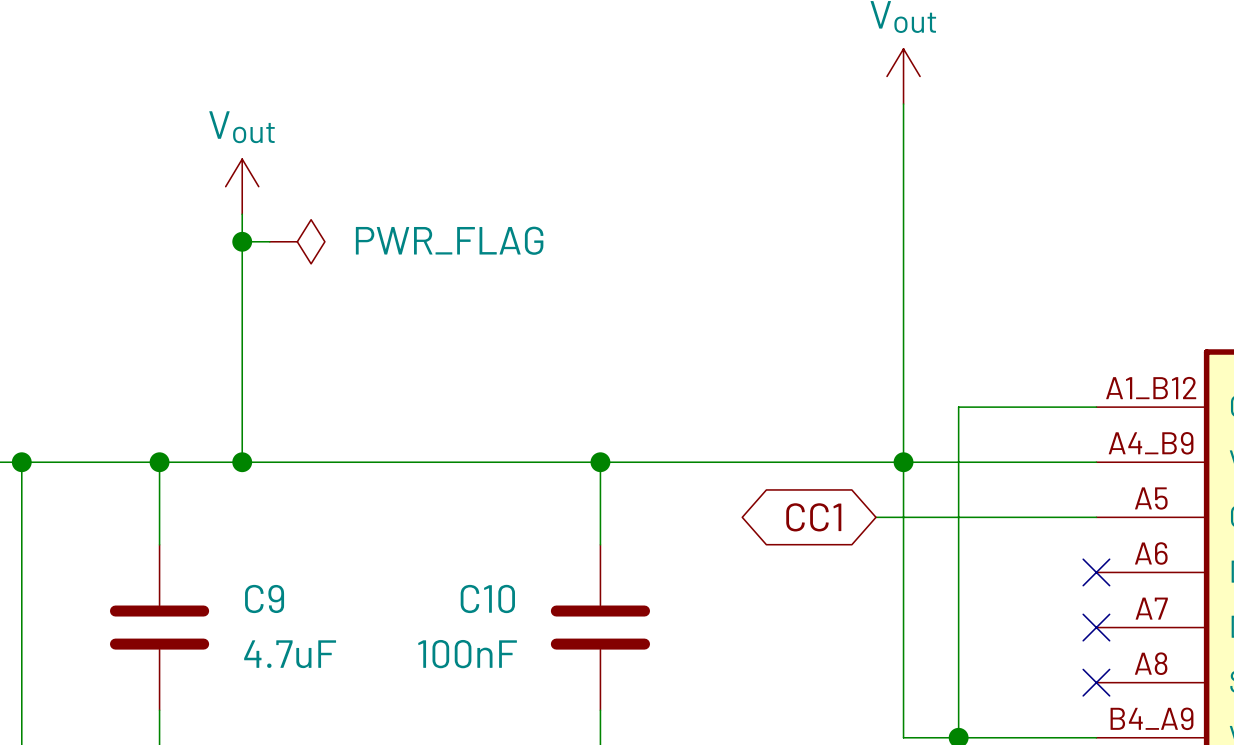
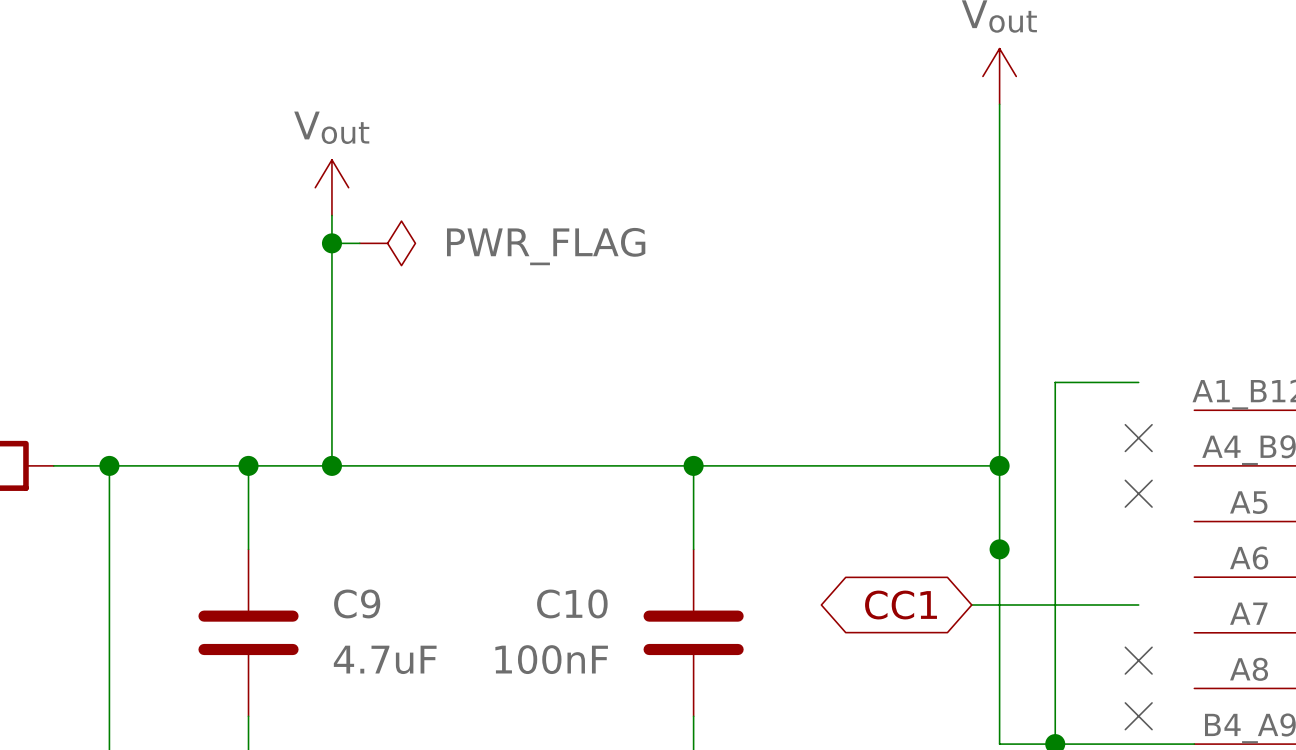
wire: (958, 407) (1096, 407) -> (1055, 410) (1055, 382) (1138, 382)
no-connect mark: none -> (1138, 438)
wire: (903, 462) (1096, 462) -> none
no-connect mark: none -> (1138, 493)
global label position: CC1 (813, 517) -> CC1 (901, 605)
wire: (875, 517) (1096, 517) -> none
junction: none -> (999, 549)
no-connect mark: (1096, 572) -> none
wire: none -> (971, 604) (1138, 604)
no-connect mark: (1096, 627) -> none
no-connect mark: none -> (1138, 660)
no-connect mark: (1096, 682) -> none
no-connect mark: none -> (1138, 716)

